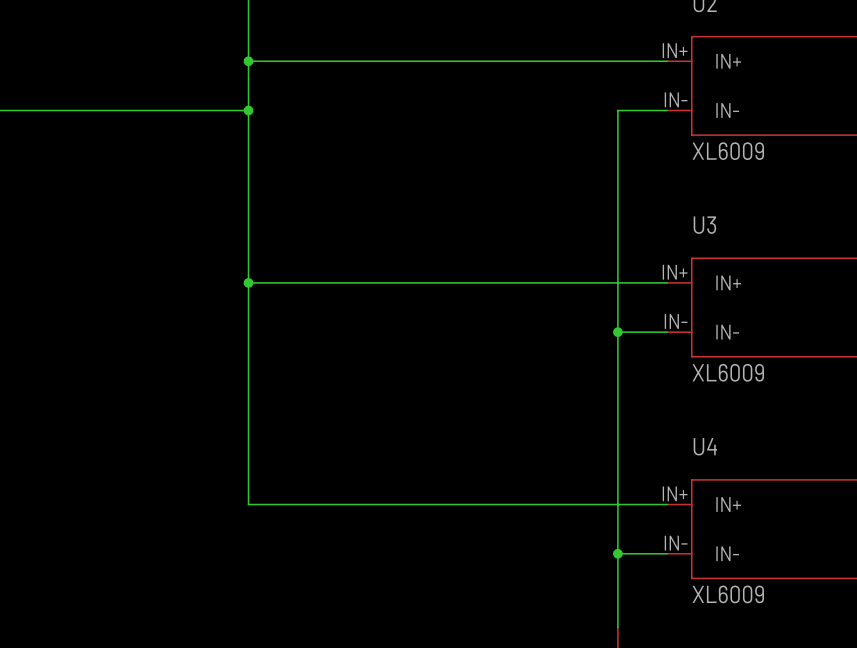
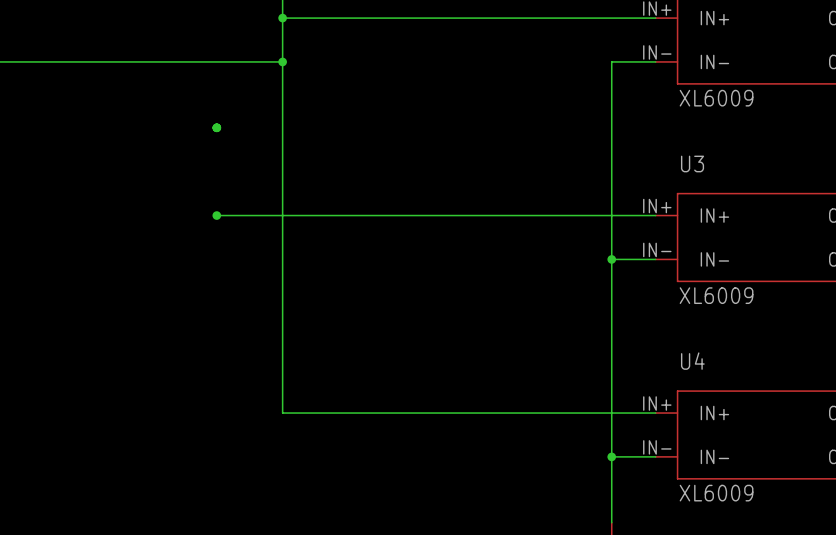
junction: none -> (216, 127)
wire: none -> (216, 215) (282, 215)
junction: none -> (216, 215)
junction: (248, 282) -> none

